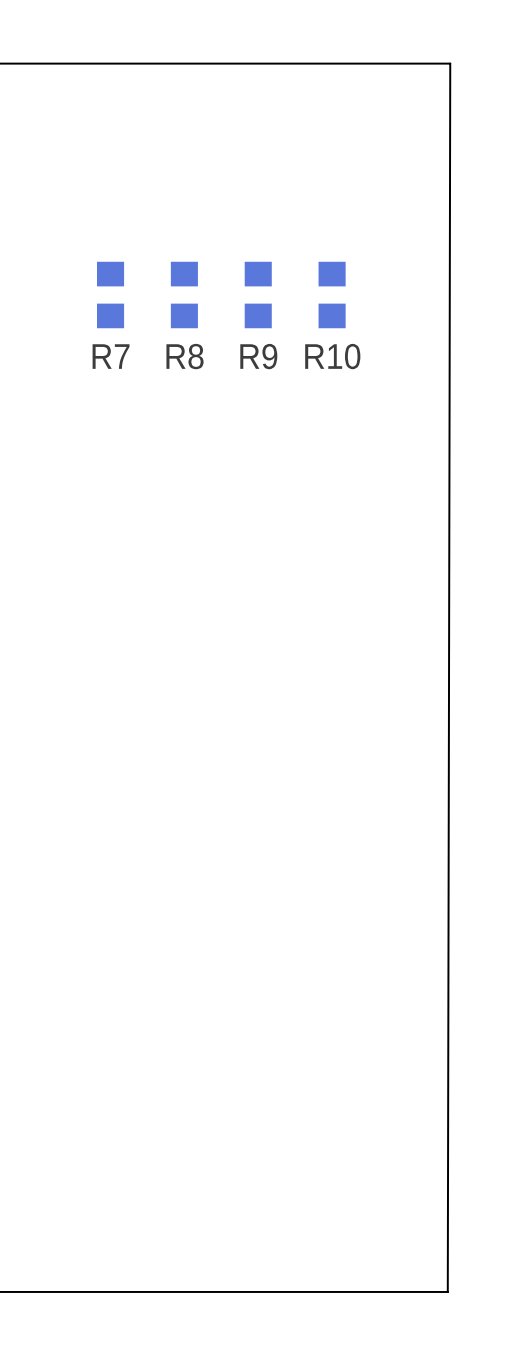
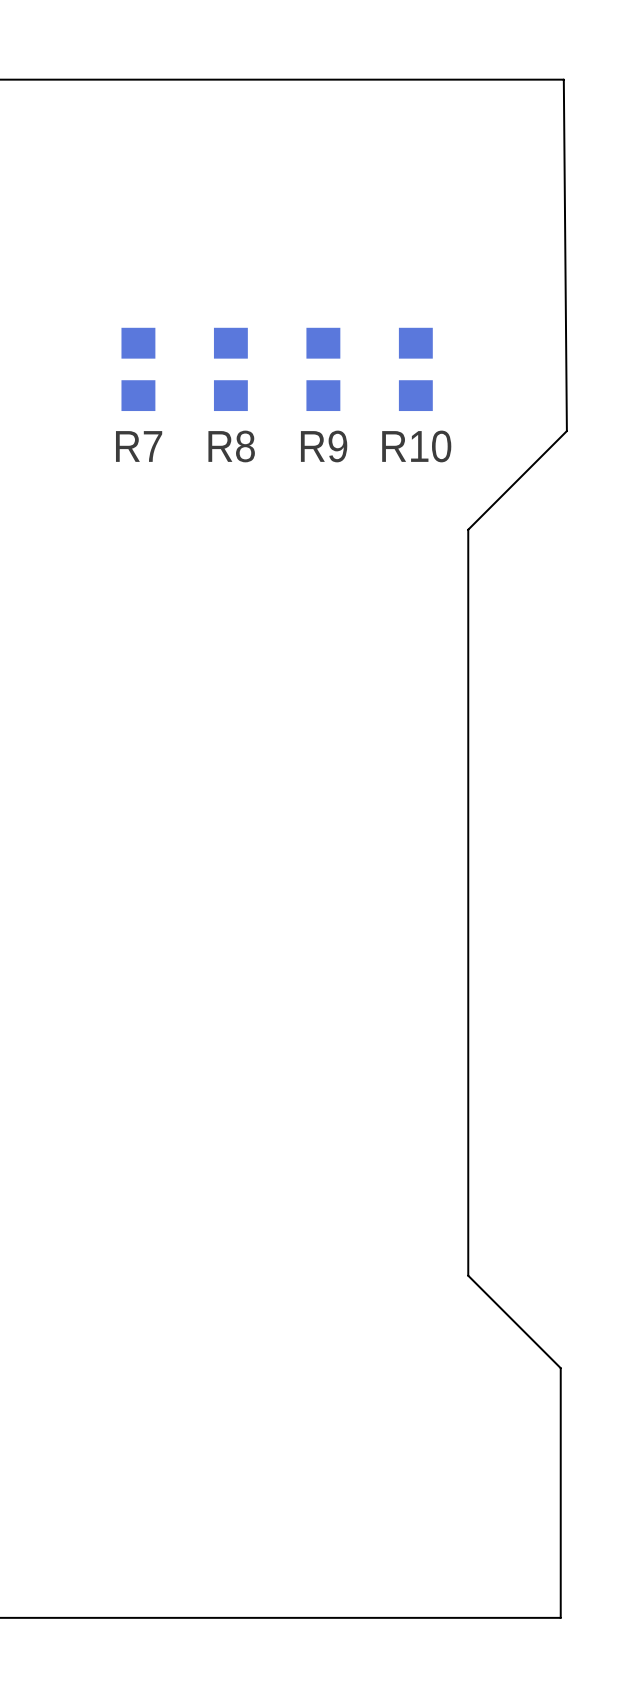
board edge: (450, 63) (447, 1291) -> (563, 79) (566, 431) (468, 529) (468, 1275) (560, 1368) (560, 1617)

